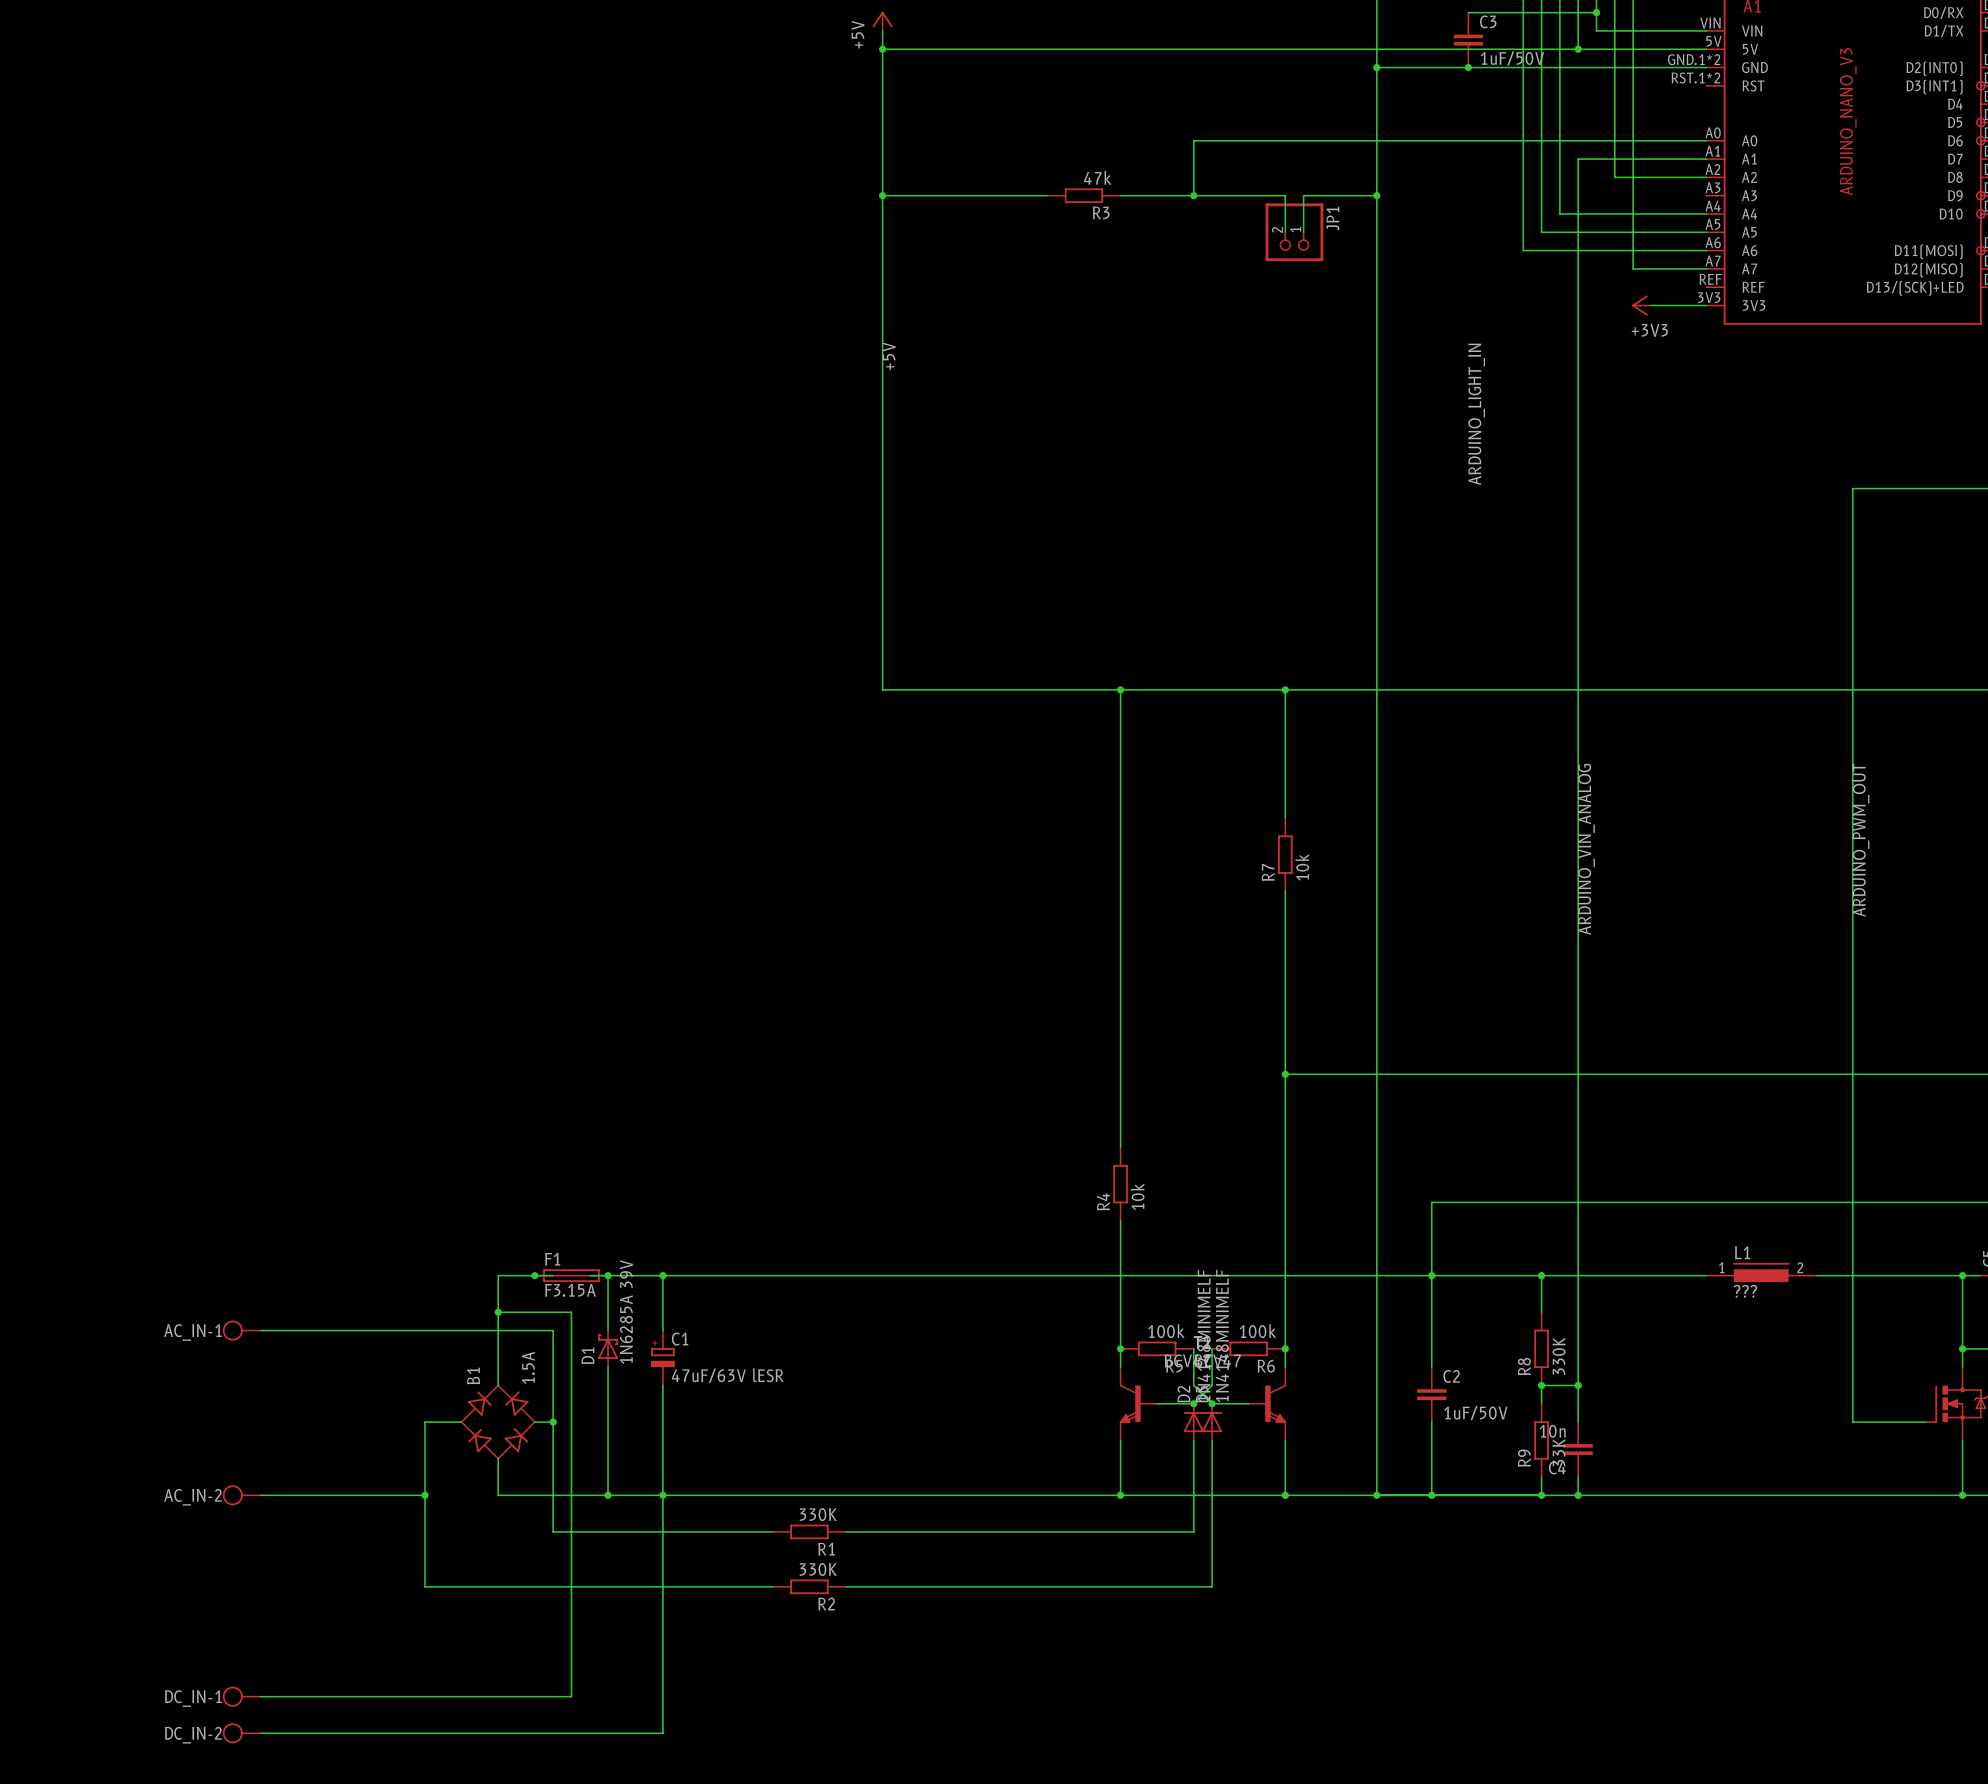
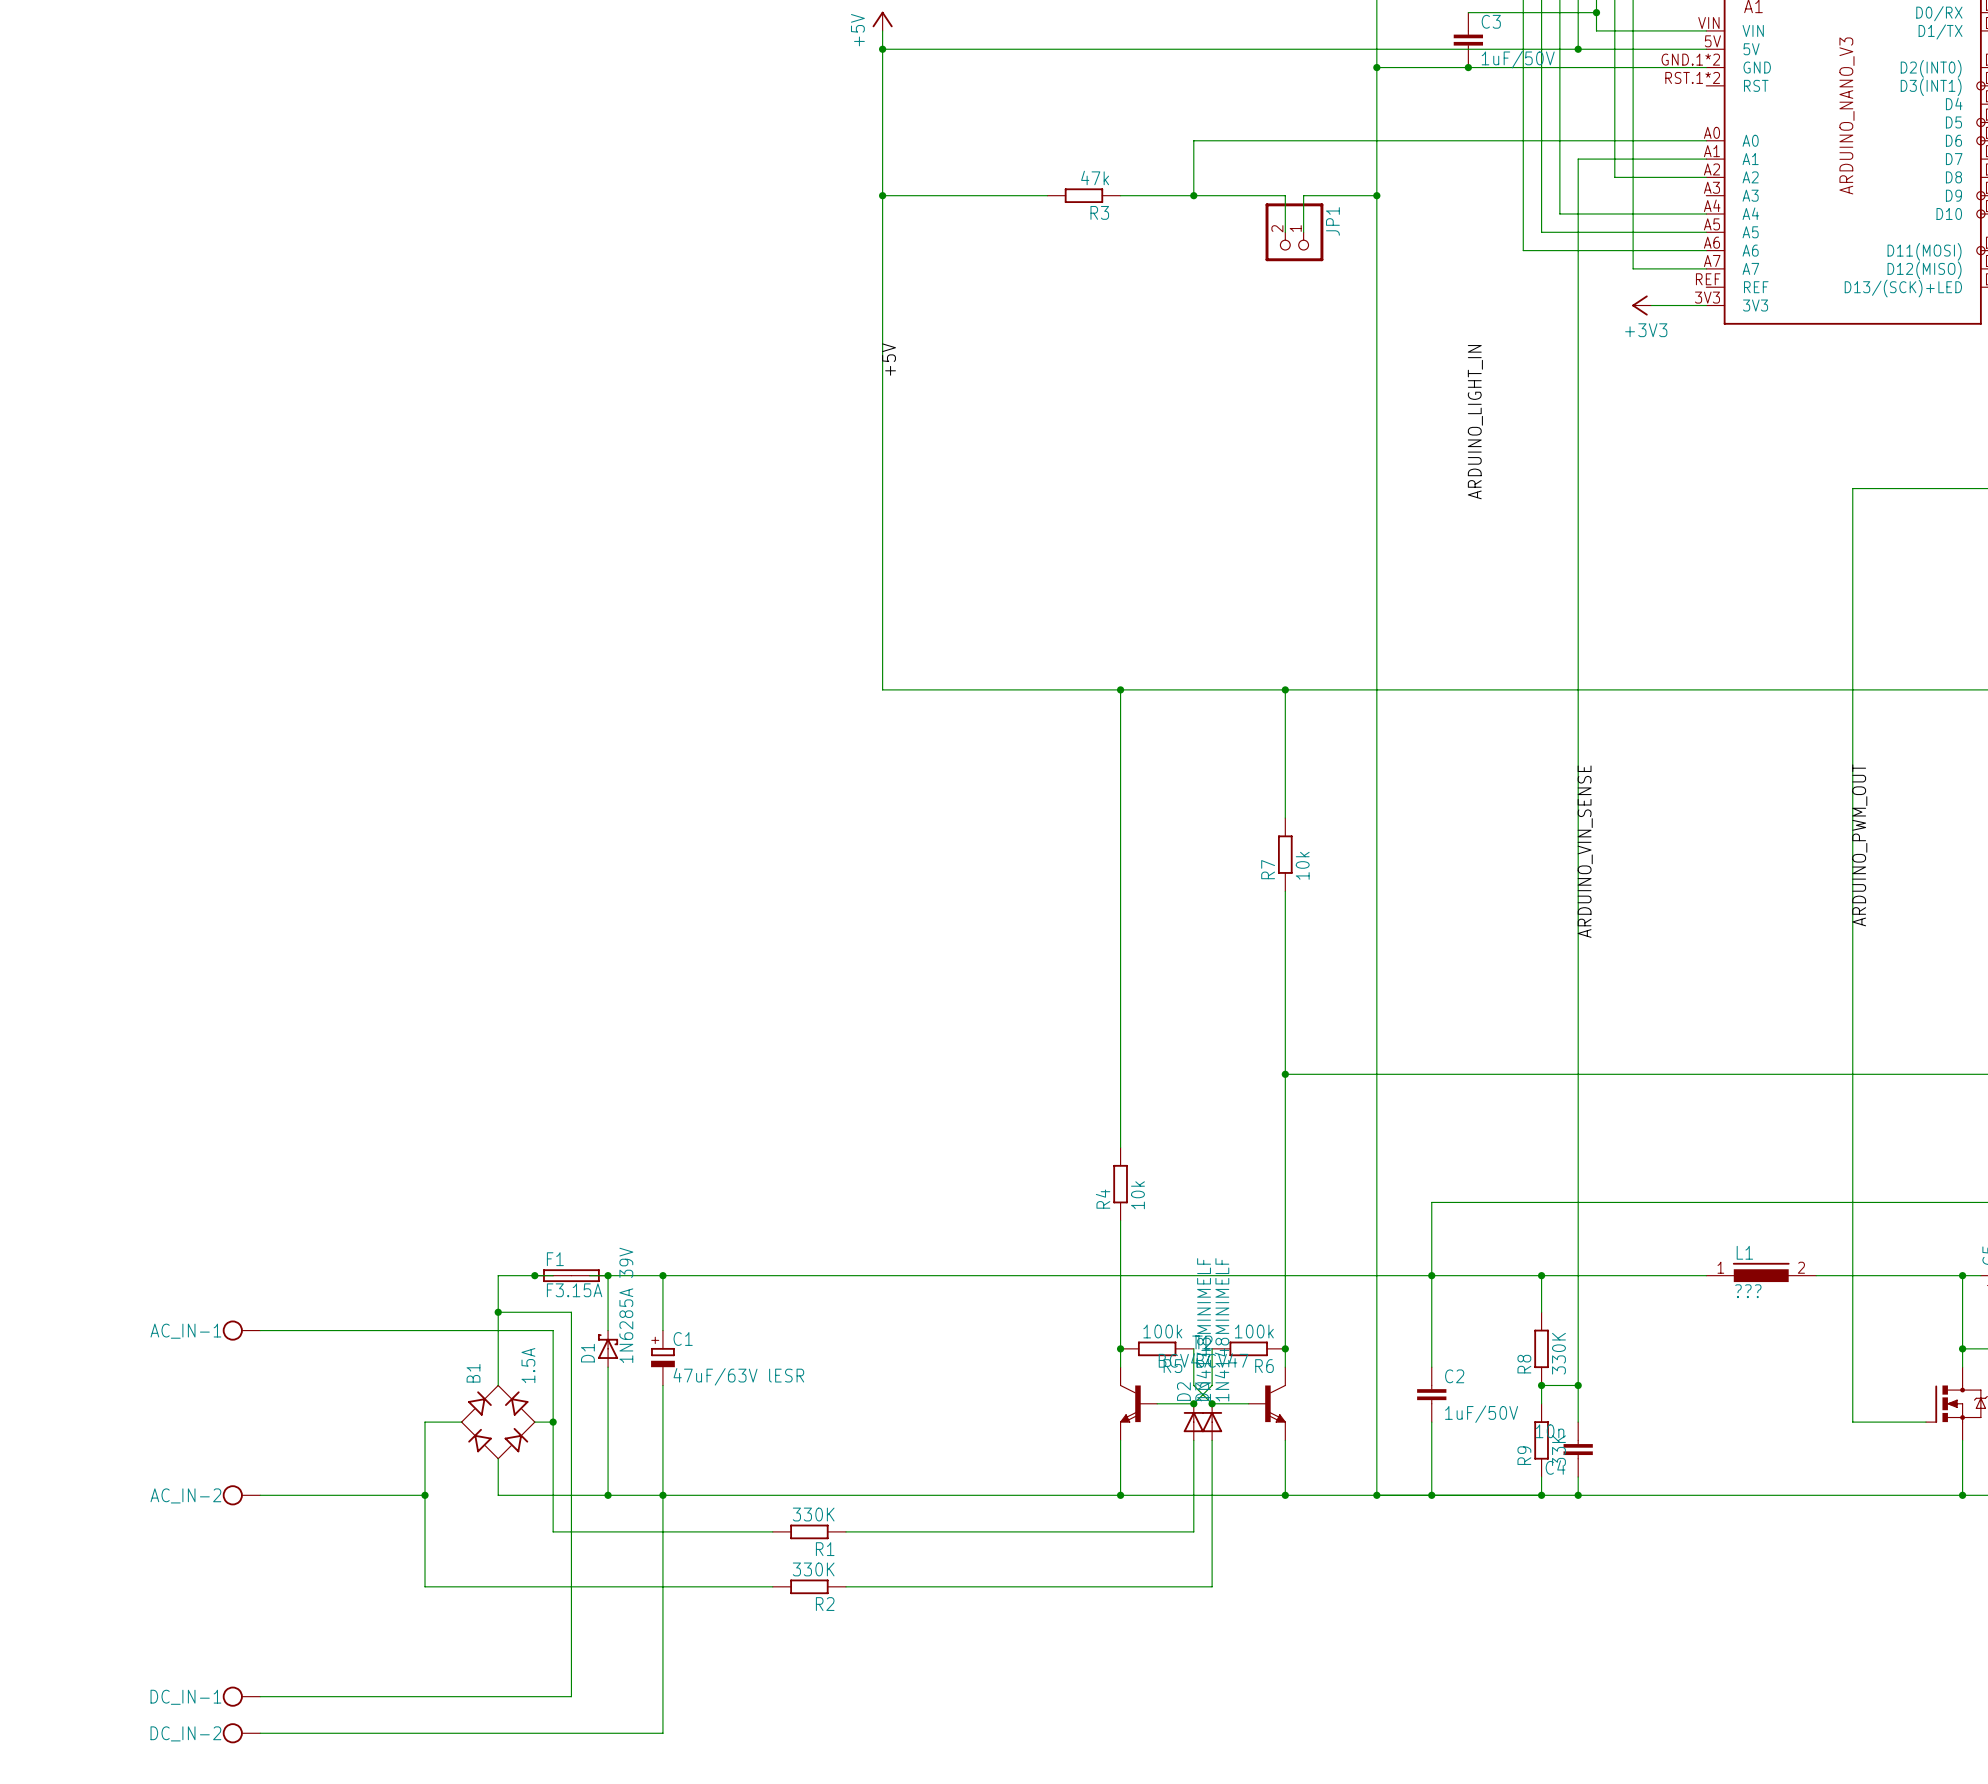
label: ARDUINO_VIN_ANALOG (1586, 849) -> ARDUINO_VIN_SENSE (1585, 851)

